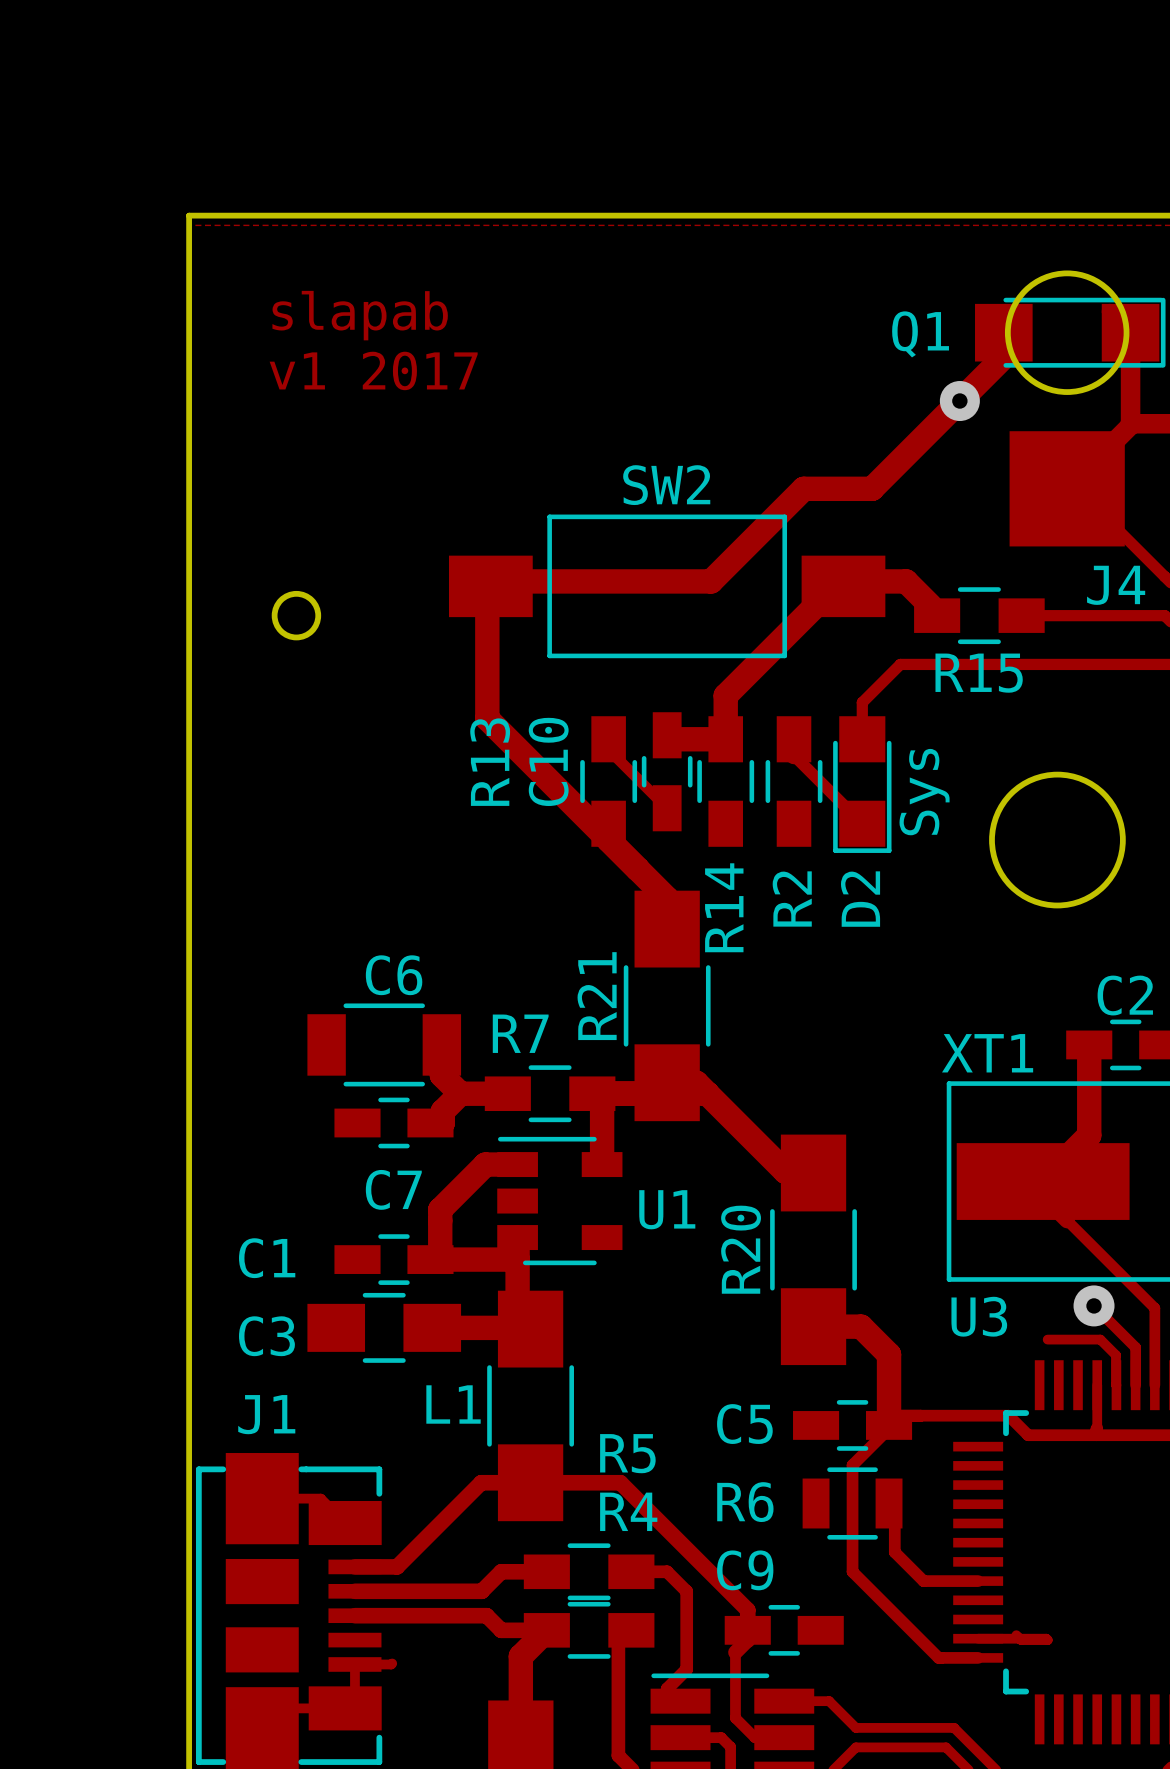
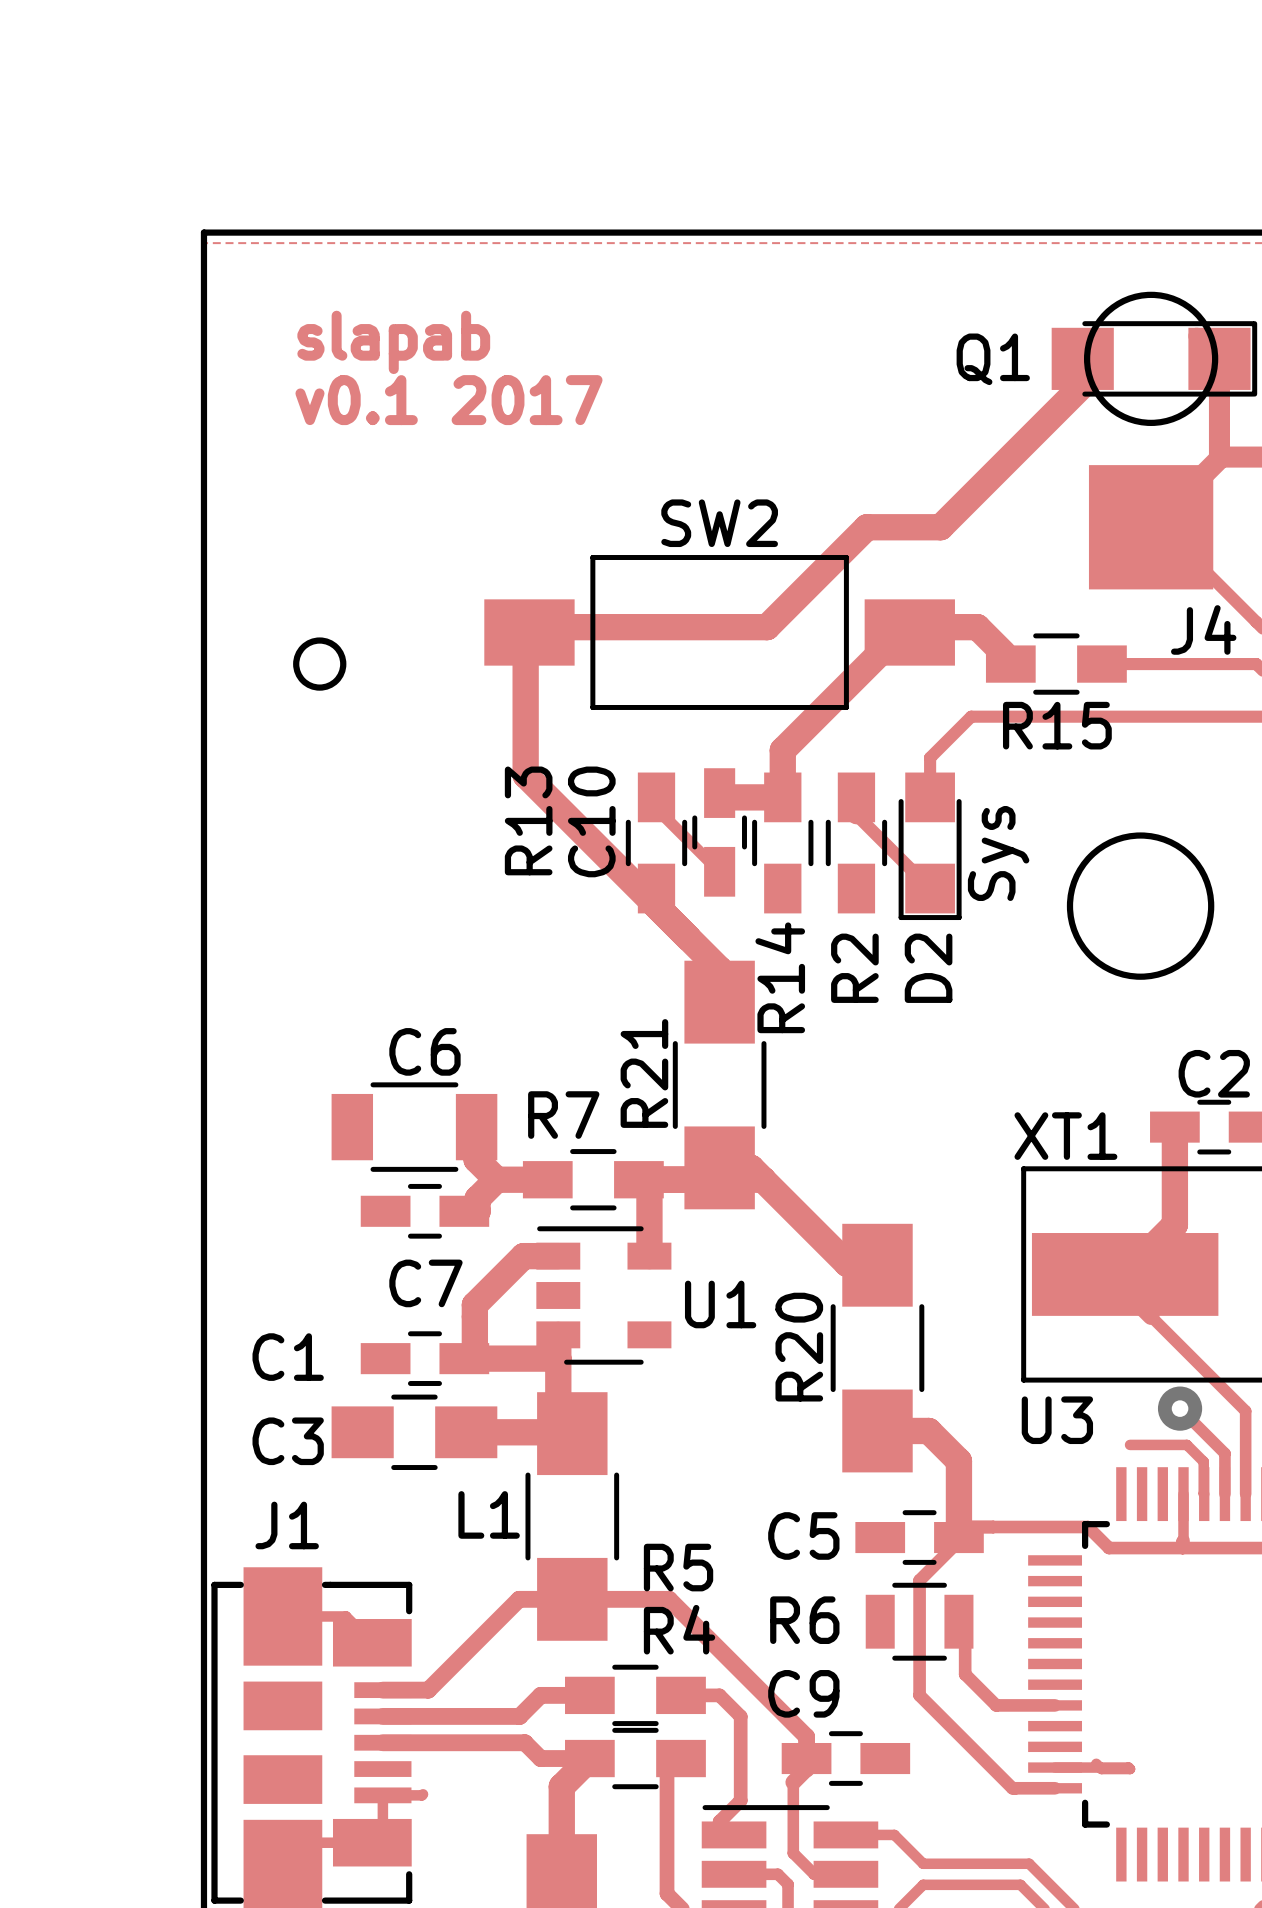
text: v1 2017 (373, 370) -> v0.1 2017 (448, 400)
via: (959, 401) -> none

